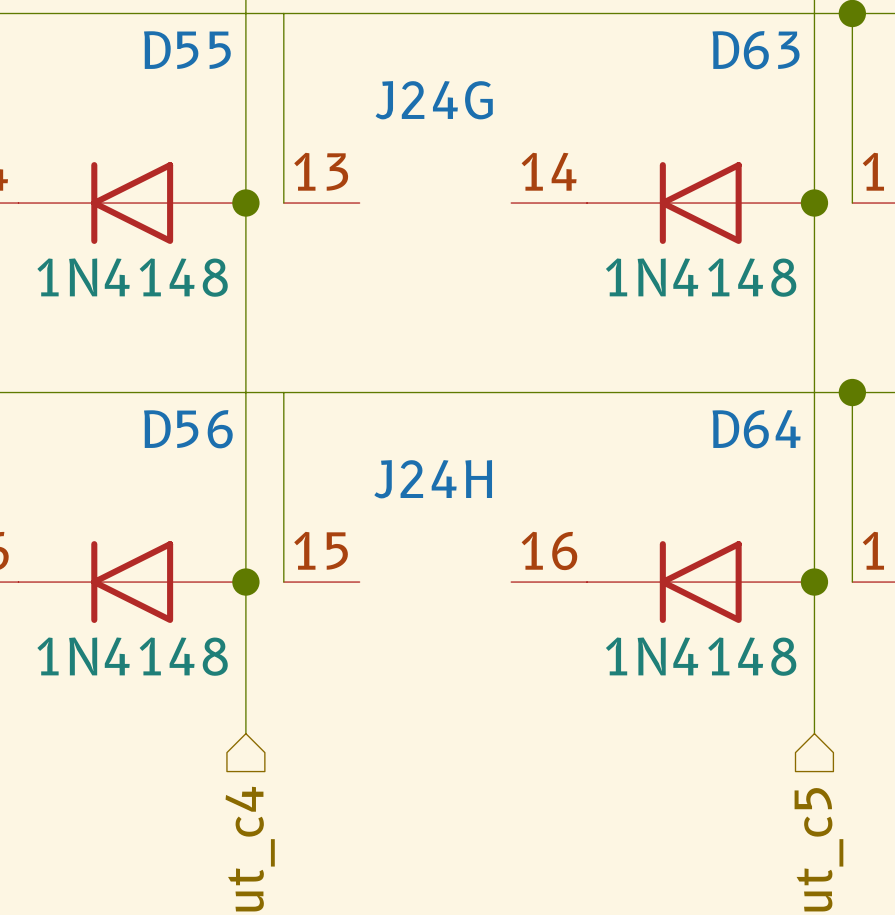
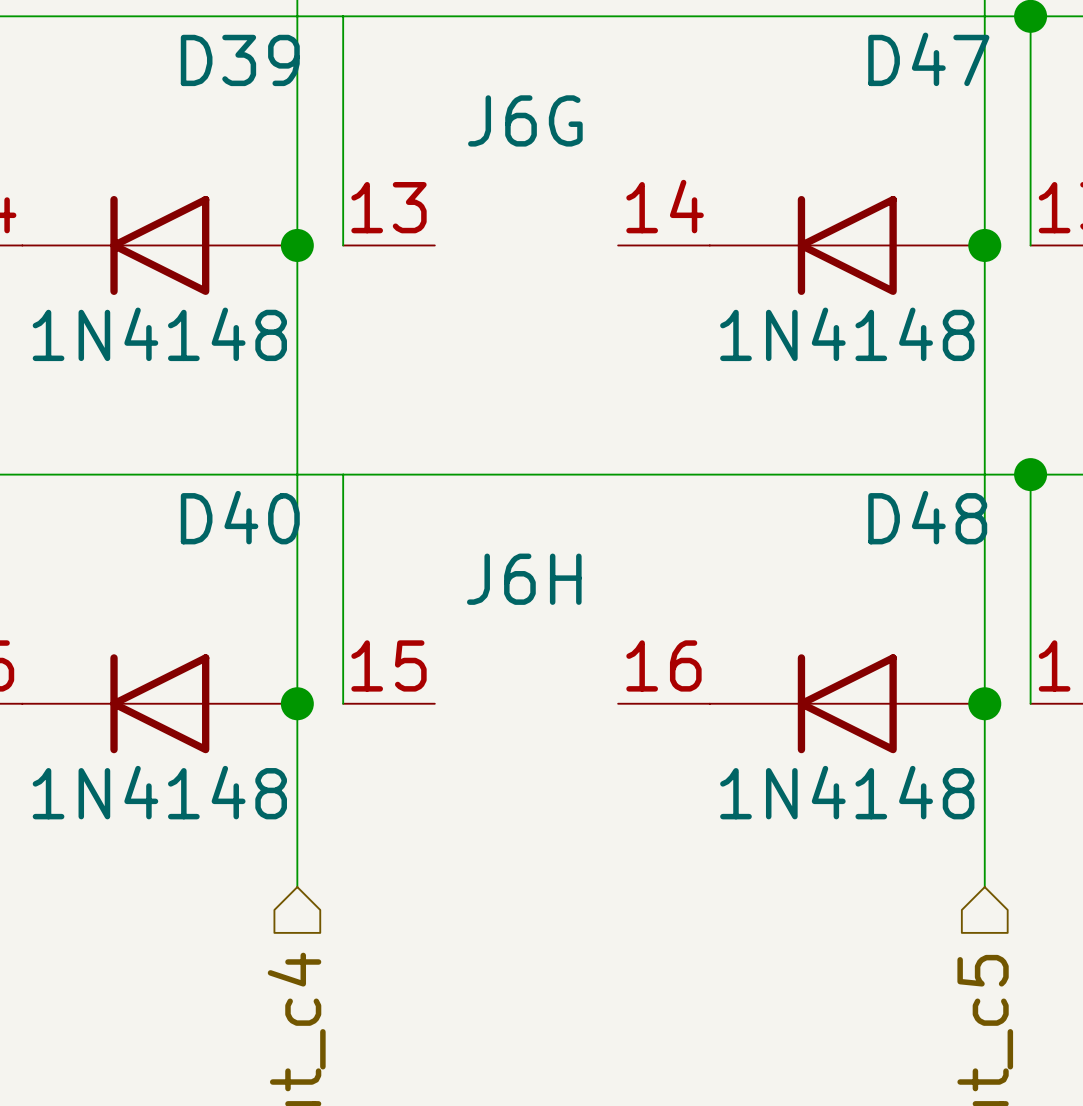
D55 name: D55 (187, 50) -> D39 (240, 60)
D63 name: D63 (756, 50) -> D47 (928, 59)
J24G name: J24G (434, 100) -> J6G (525, 120)
D56 name: D56 (188, 429) -> D40 (240, 517)
D64 name: D64 (756, 429) -> D48 (927, 517)
J24H name: J24H (433, 479) -> J6H (524, 579)

